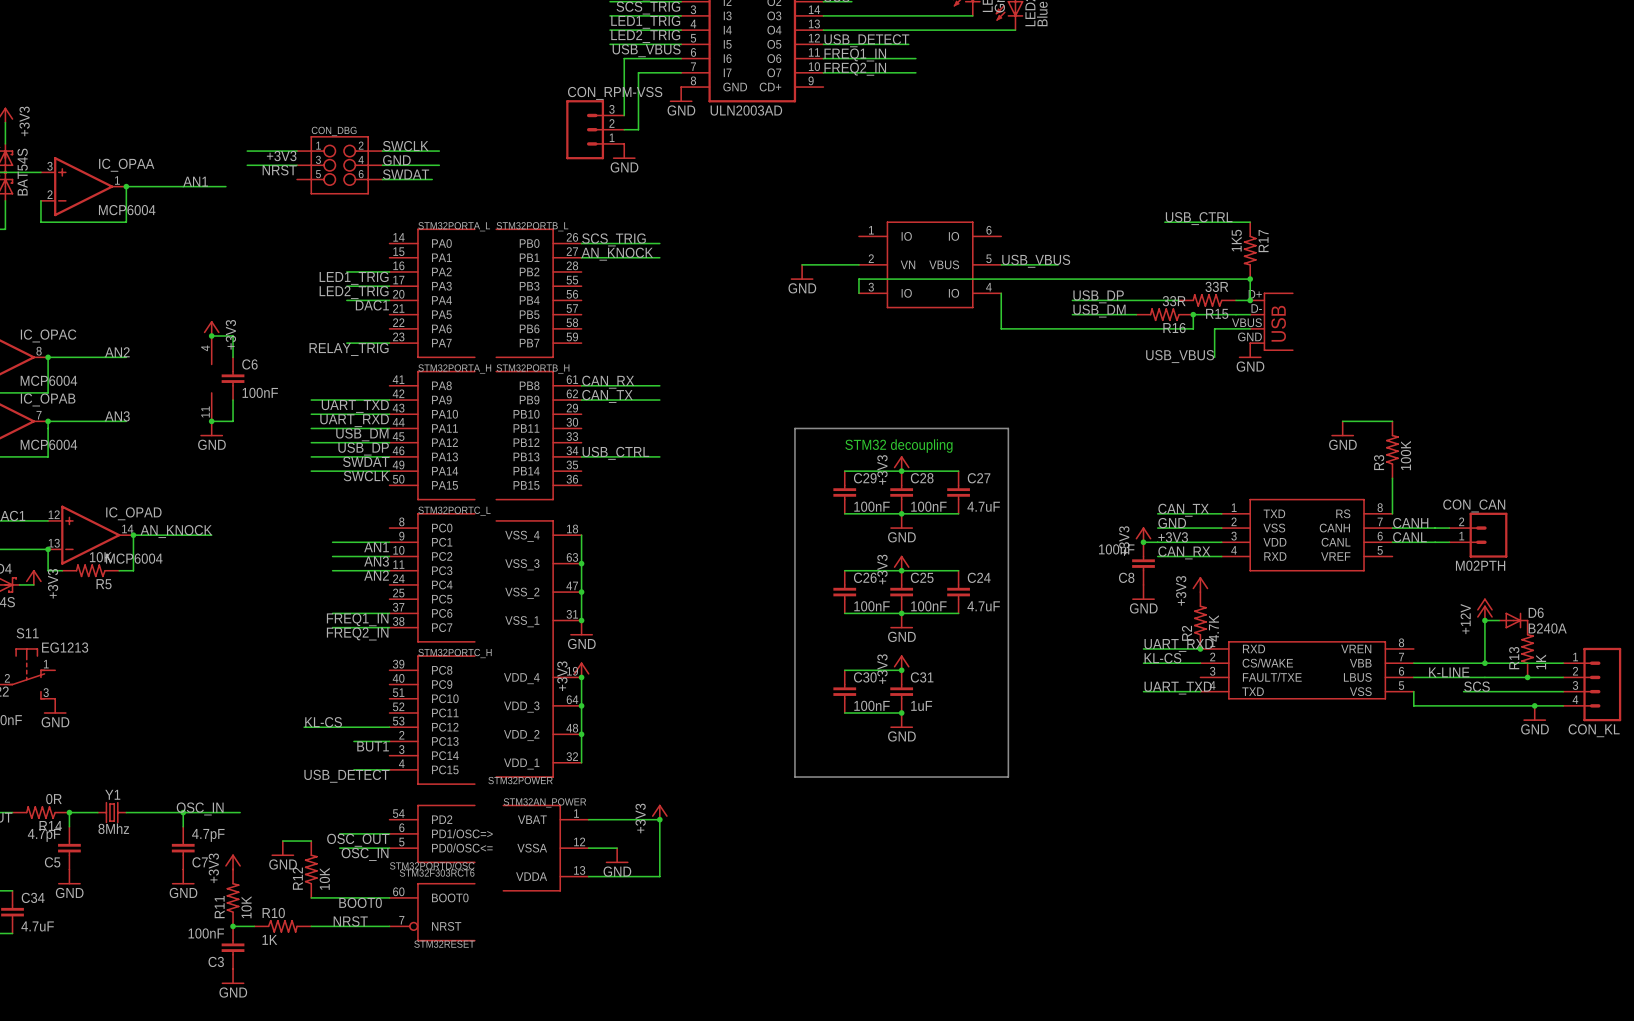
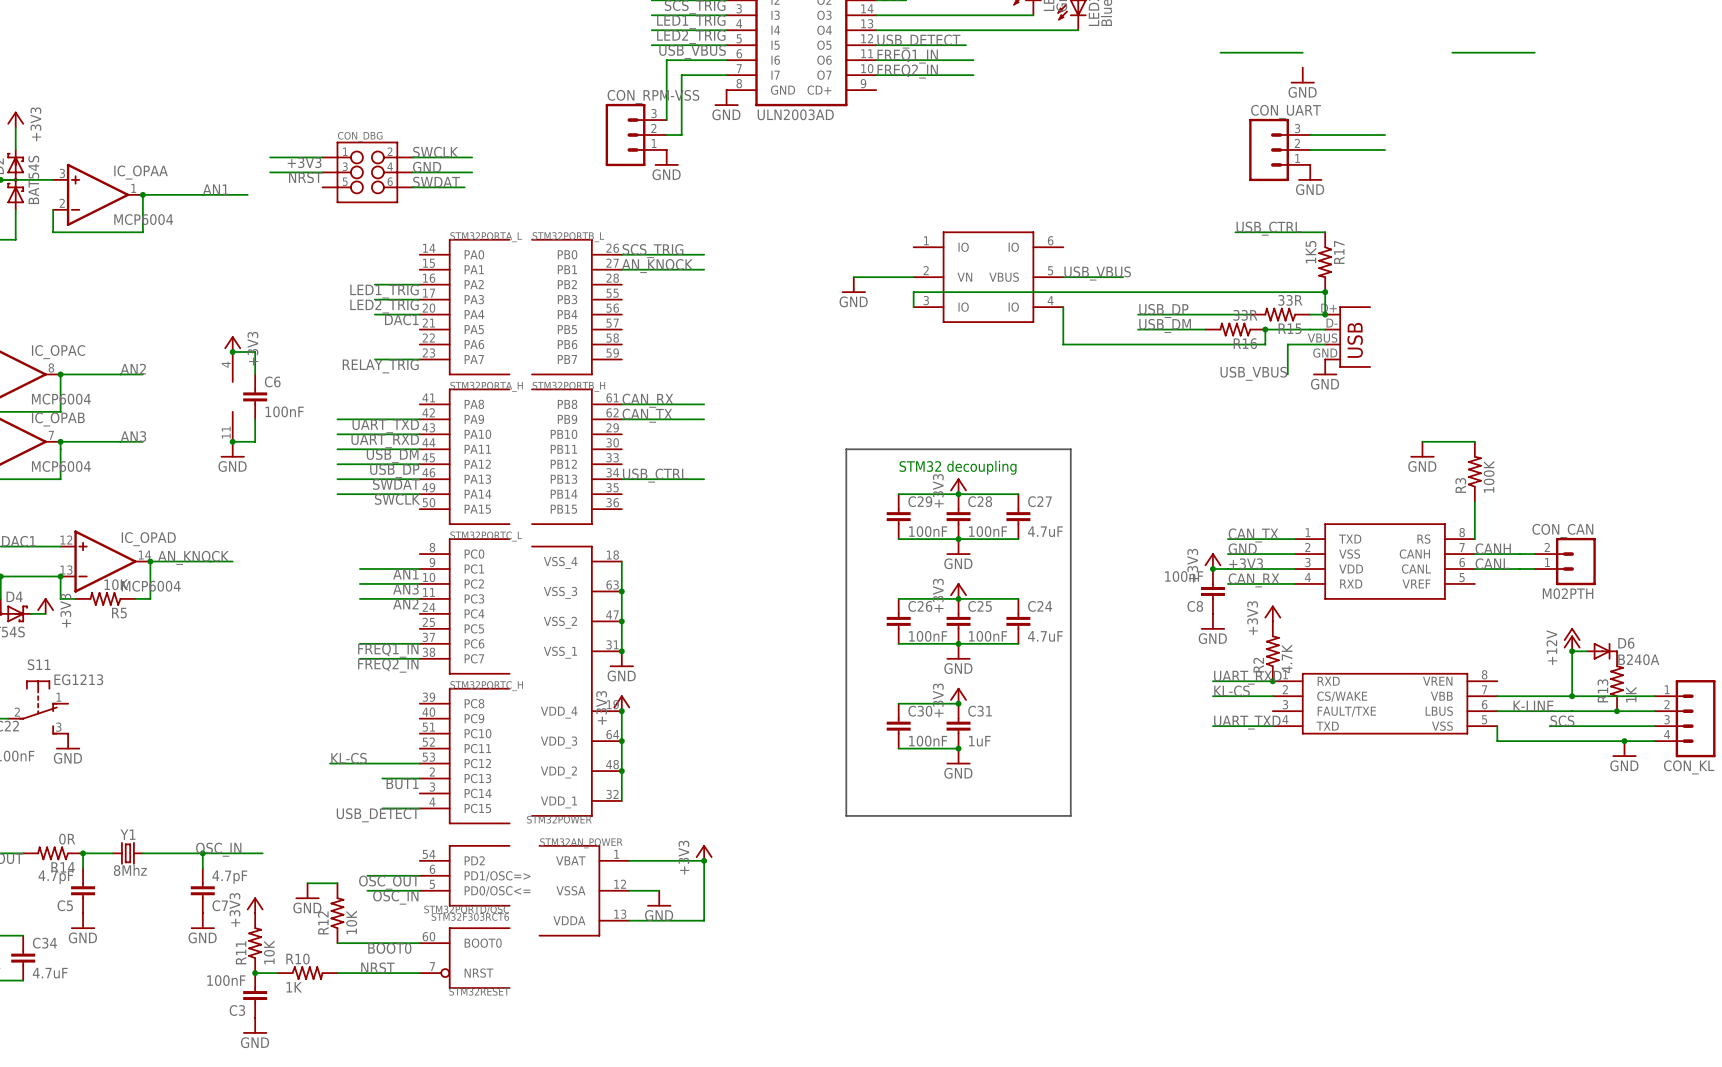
wire: none -> (1220, 52) (1302, 52)
wire: none -> (1452, 52) (1534, 52)
power symbol: none -> GND (1302, 75)
wire: none -> (1310, 135) (1385, 135)
CON_UART: none -> (1279, 149)
wire: none -> (1310, 149) (1385, 149)
power symbol: none -> GND (1310, 172)

